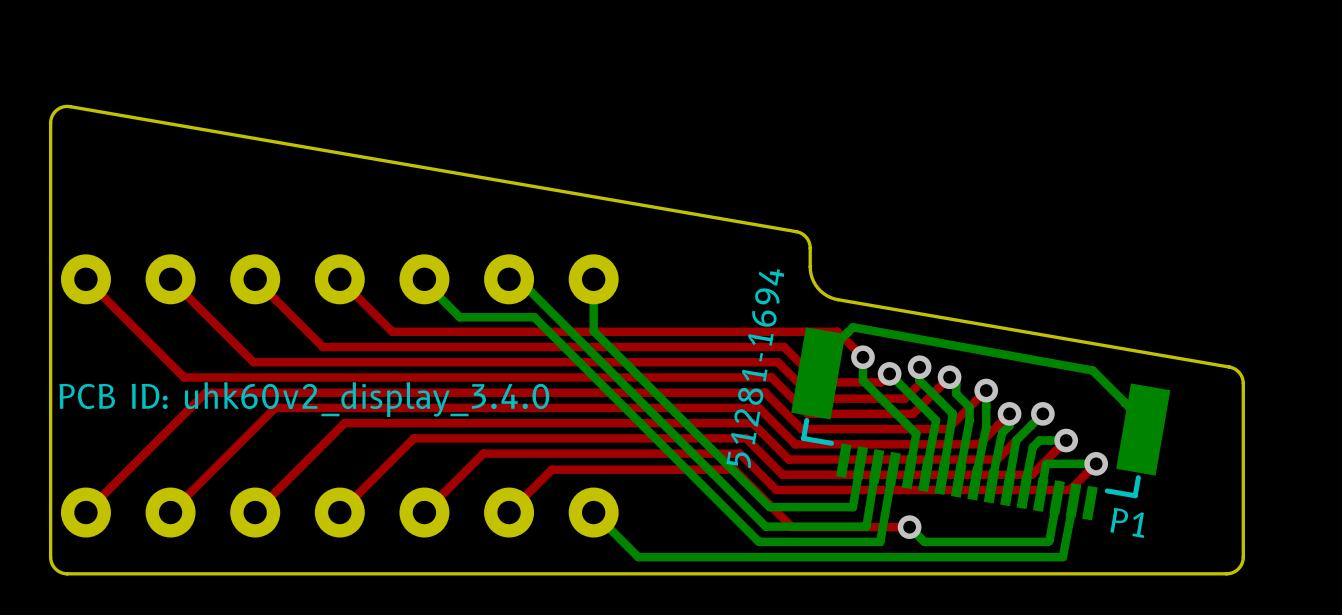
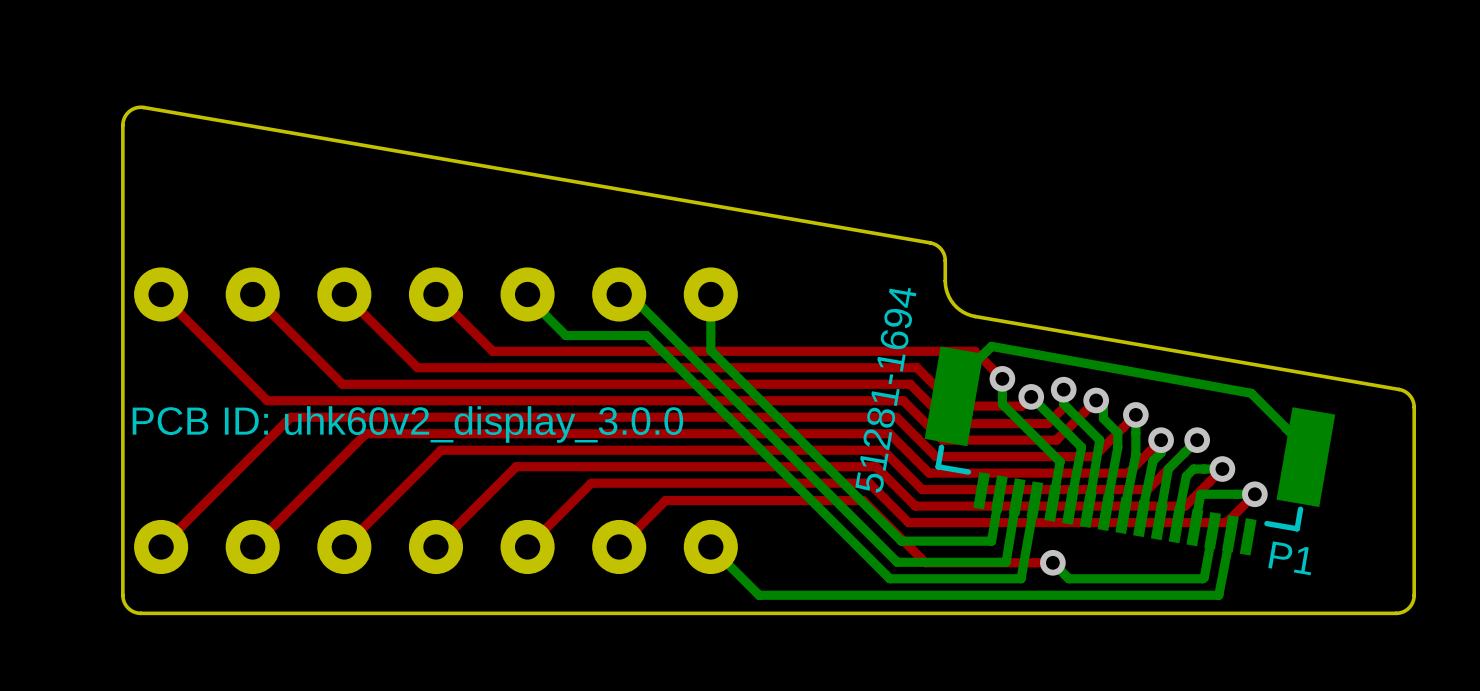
text: PCB ID: uhk60v2_display_3.4.0 (304, 399) -> PCB ID: uhk60v2_display_3.0.0 (407, 424)

